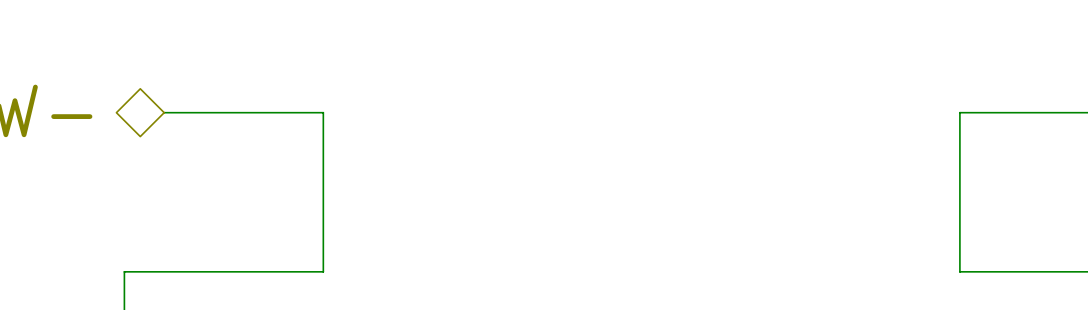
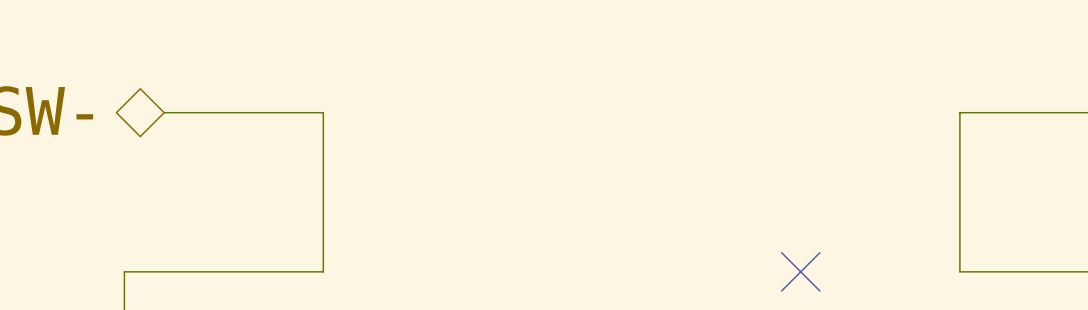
no-connect mark: none -> (800, 271)

